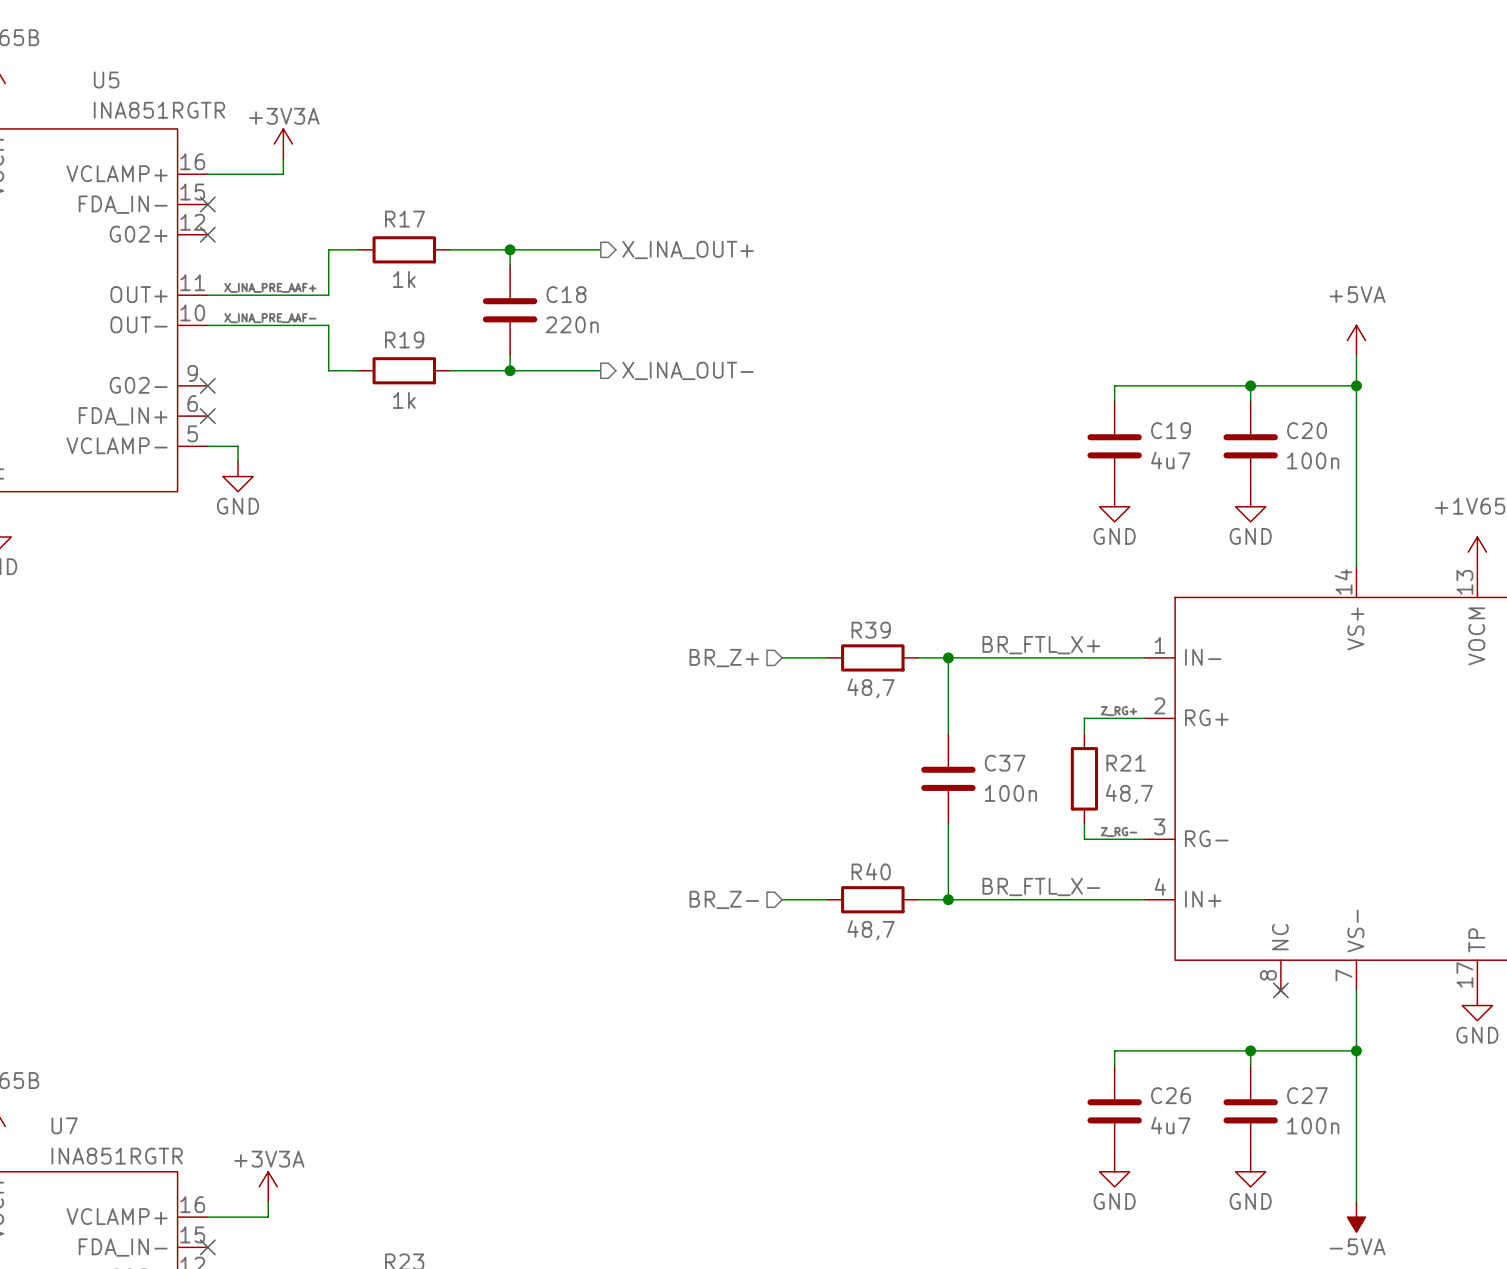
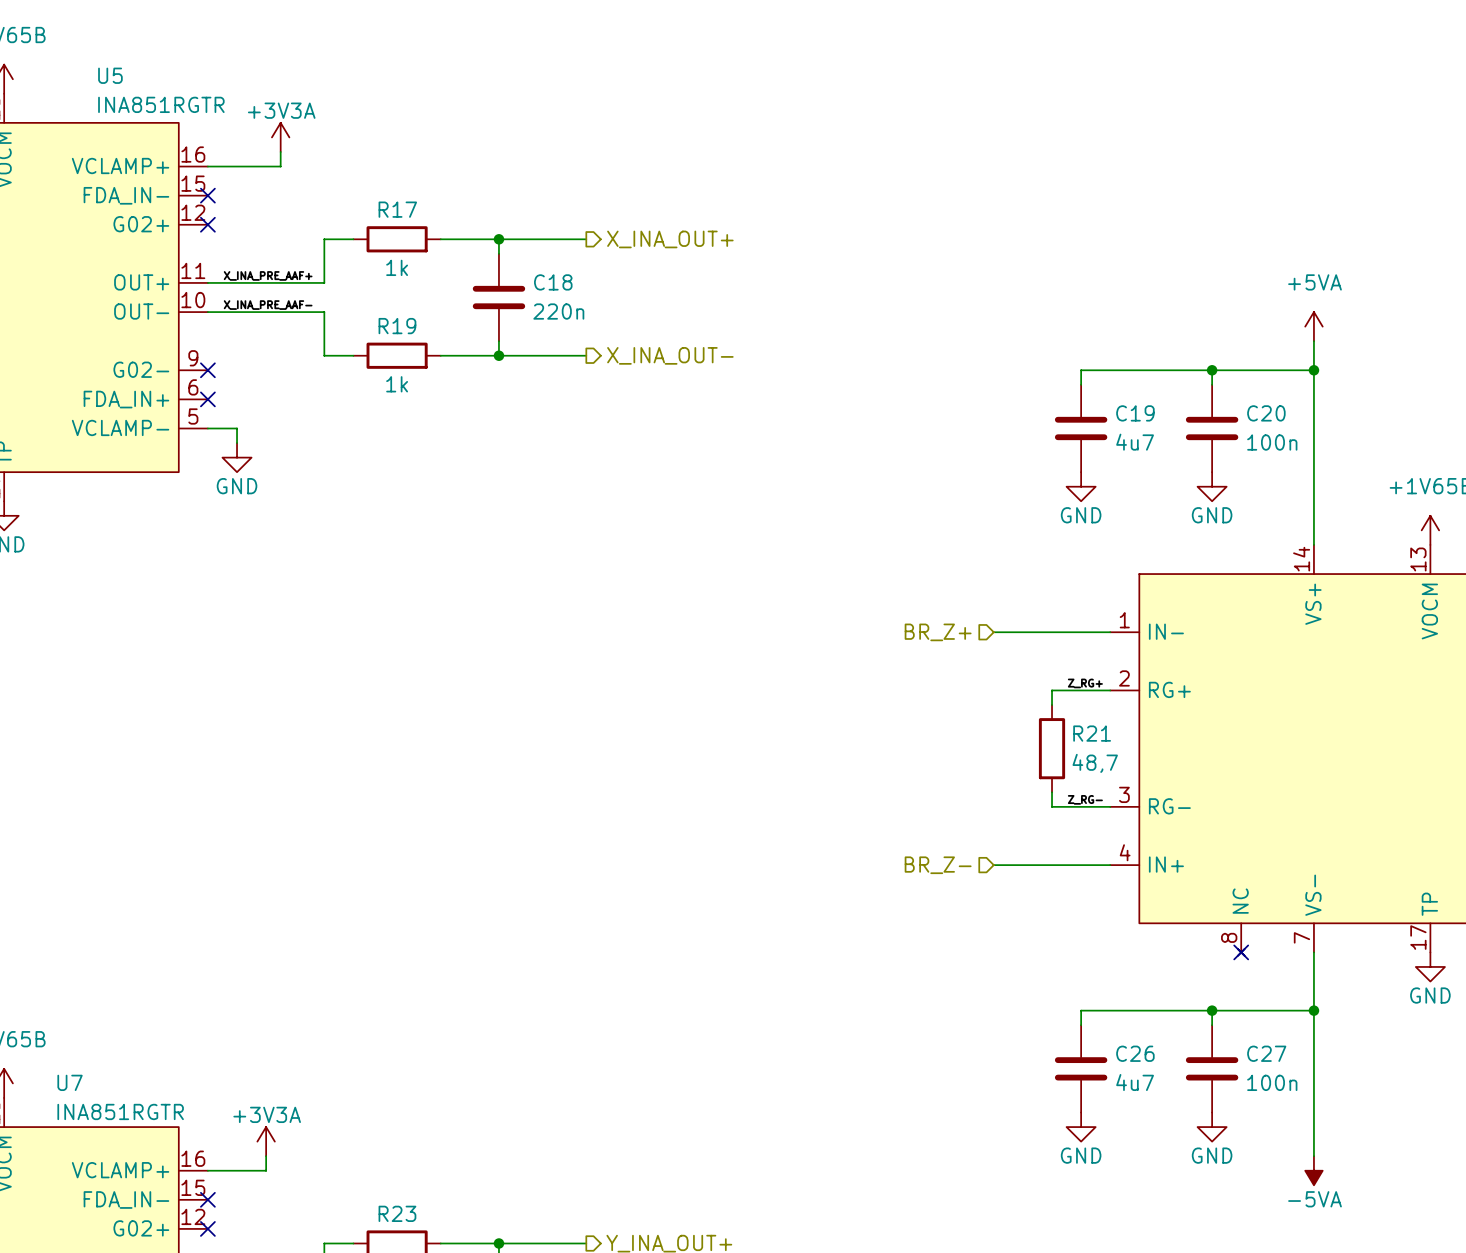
label: BR_FTL_X+ (1041, 645) -> none
wire: (782, 657) (827, 657) -> none
R39: 48,7 (872, 657) -> none
wire: (918, 657) (1023, 657) -> none
wire: (948, 657) (948, 733) -> none
junction: (948, 657) -> none
hierarchical label position: BR_Z+ (724, 658) -> BR_Z+ (938, 632)
C37: 100n (948, 778) -> none
wire: (948, 824) (948, 899) -> none
label: BR_FTL_X- (1041, 886) -> none
hierarchical label position: BR_Z- (724, 899) -> BR_Z- (938, 865)
wire: (782, 899) (827, 899) -> none
R40: 48,7 (872, 899) -> none
wire: (918, 899) (1023, 899) -> none
junction: (948, 899) -> none

